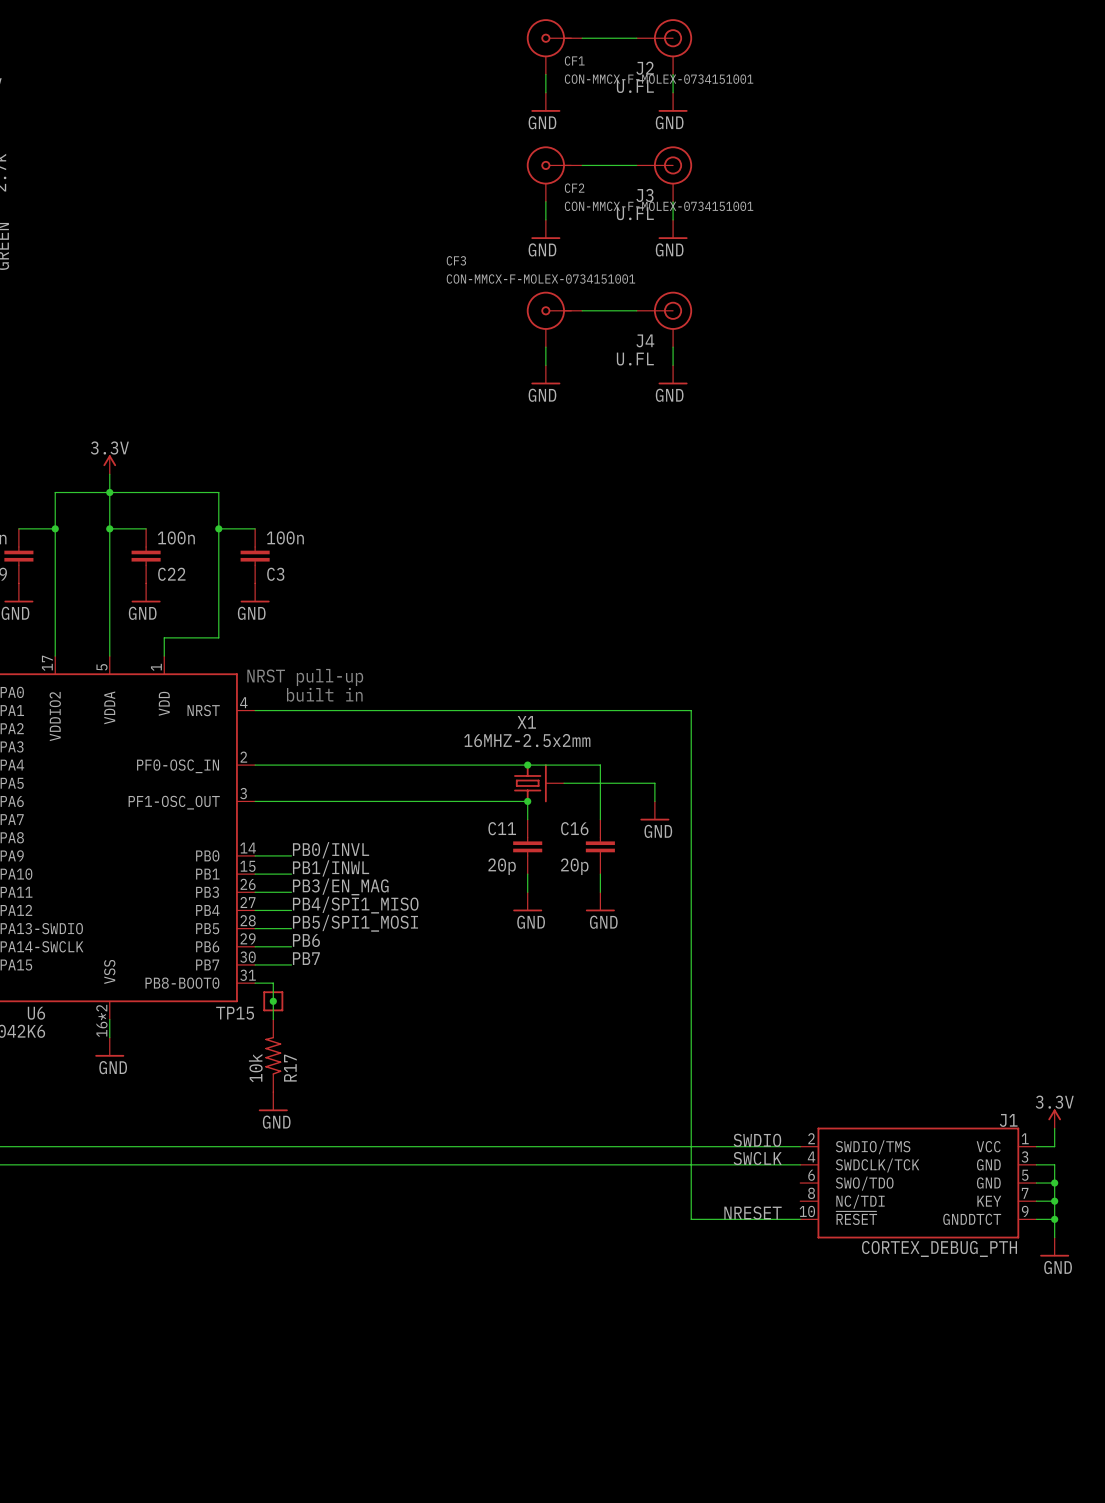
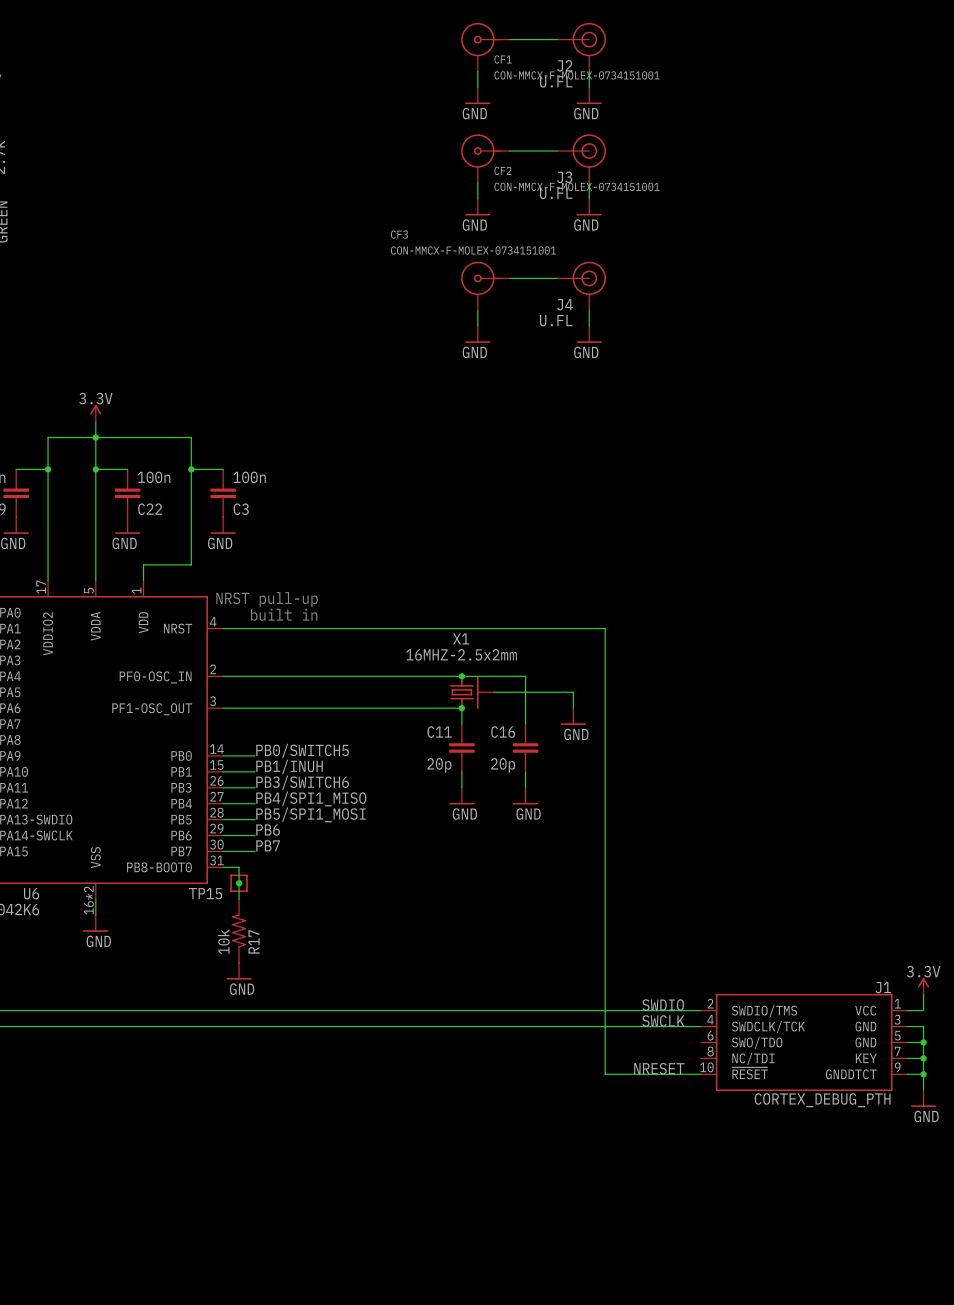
label: PB0/INVL (331, 850) -> PB0/SWITCH5 (302, 750)
label: PB1/INWL (331, 868) -> PB1/INUH (289, 766)
label: PB3/EN_MAG (340, 886) -> PB3/SWITCH6 (302, 782)

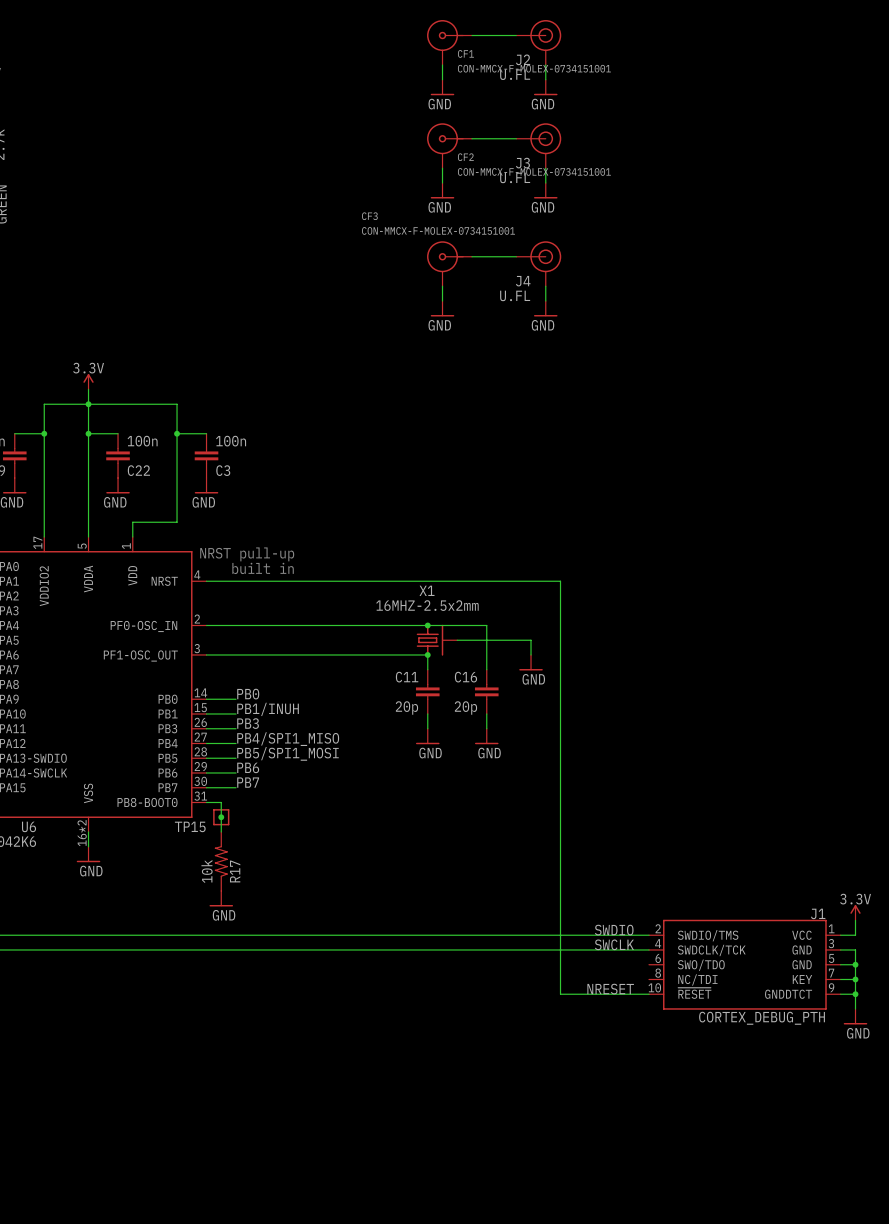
label: PB0/SWITCH5 (302, 750) -> PB0 (248, 694)
label: PB3/SWITCH6 (302, 782) -> PB3 (248, 723)

